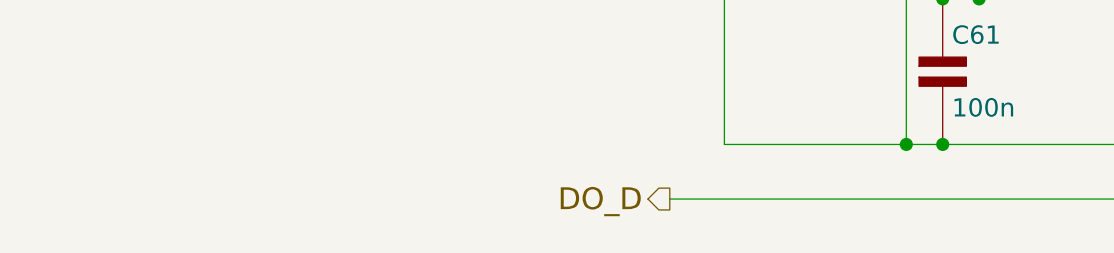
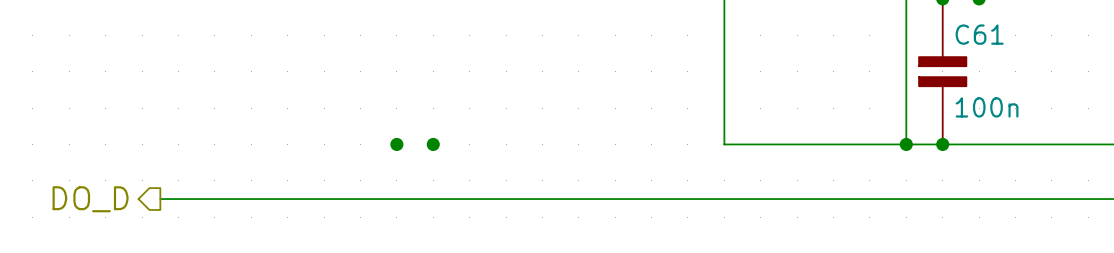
junction: none -> (396, 144)
junction: none -> (433, 144)
wire: none -> (160, 199) (669, 199)
hierarchical label: none -> DO_D (90, 199)
hierarchical label: DO_D (600, 201) -> none

